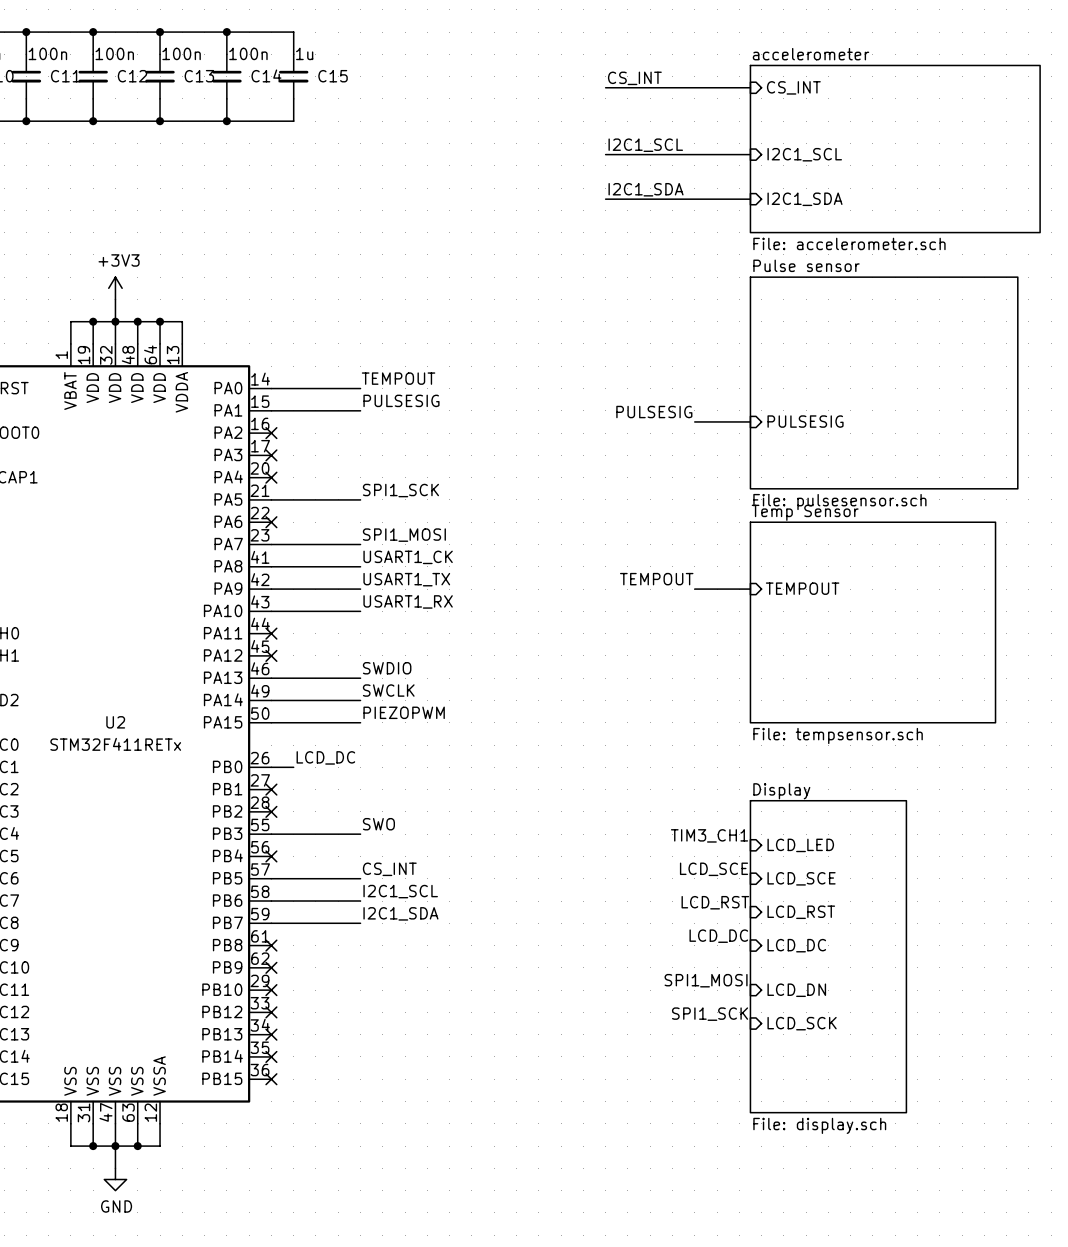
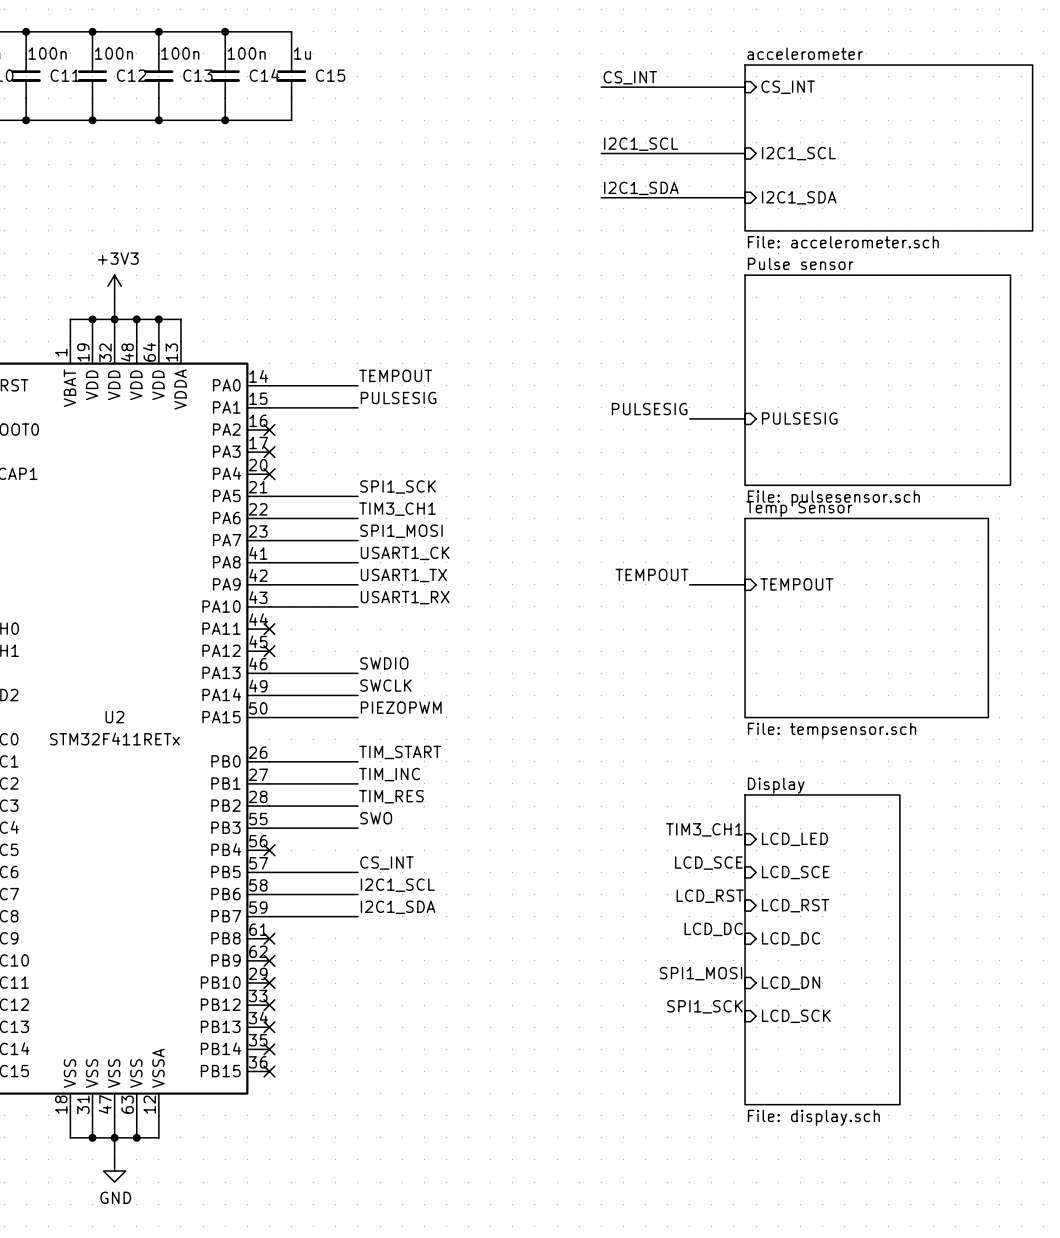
label: none -> TIM3_CH1 (397, 509)
wire: none -> (269, 518) (357, 518)
no-connect mark: (271, 522) -> none
label: LCD_DC (325, 757) -> none
label: none -> TIM_START (400, 752)
wire: none -> (291, 761) (357, 761)
label: none -> TIM_INC (389, 774)
wire: none -> (269, 783) (357, 783)
no-connect mark: (271, 789) -> none
label: none -> TIM_RES (391, 796)
wire: none -> (269, 806) (357, 806)
no-connect mark: (271, 811) -> none

